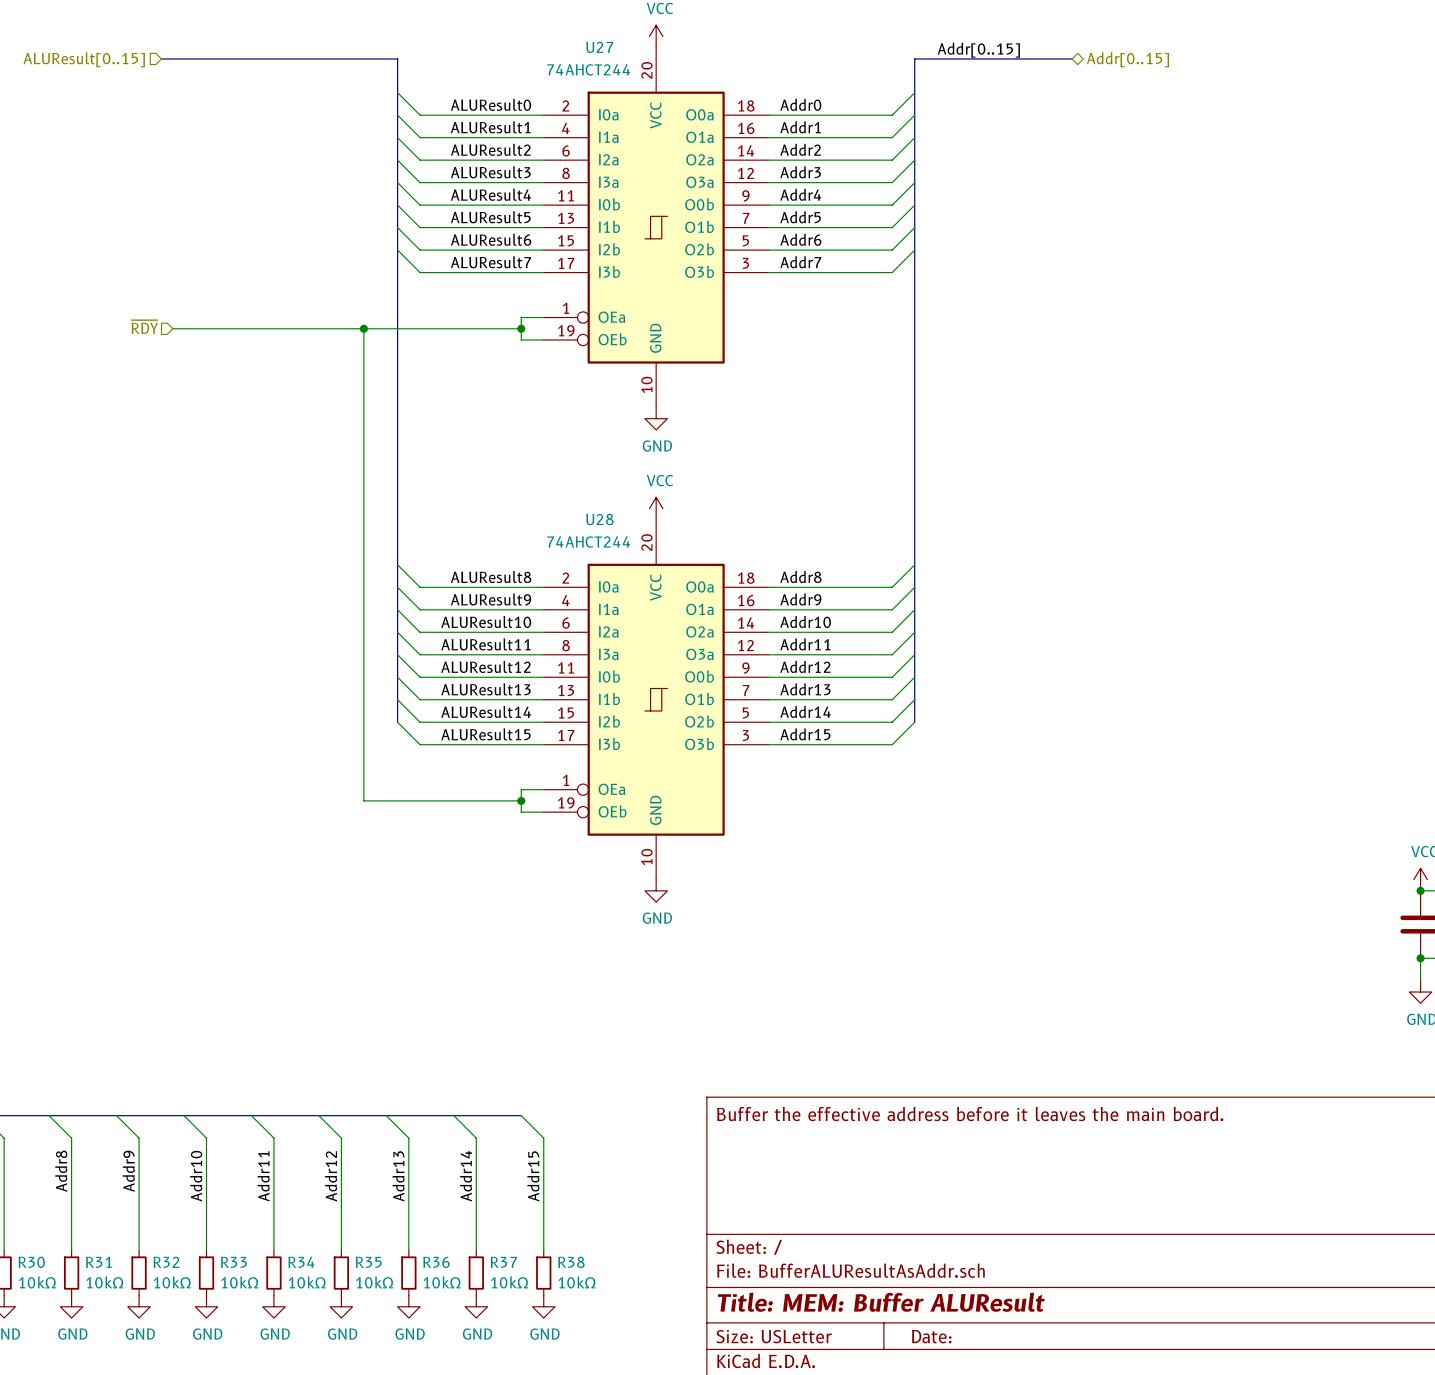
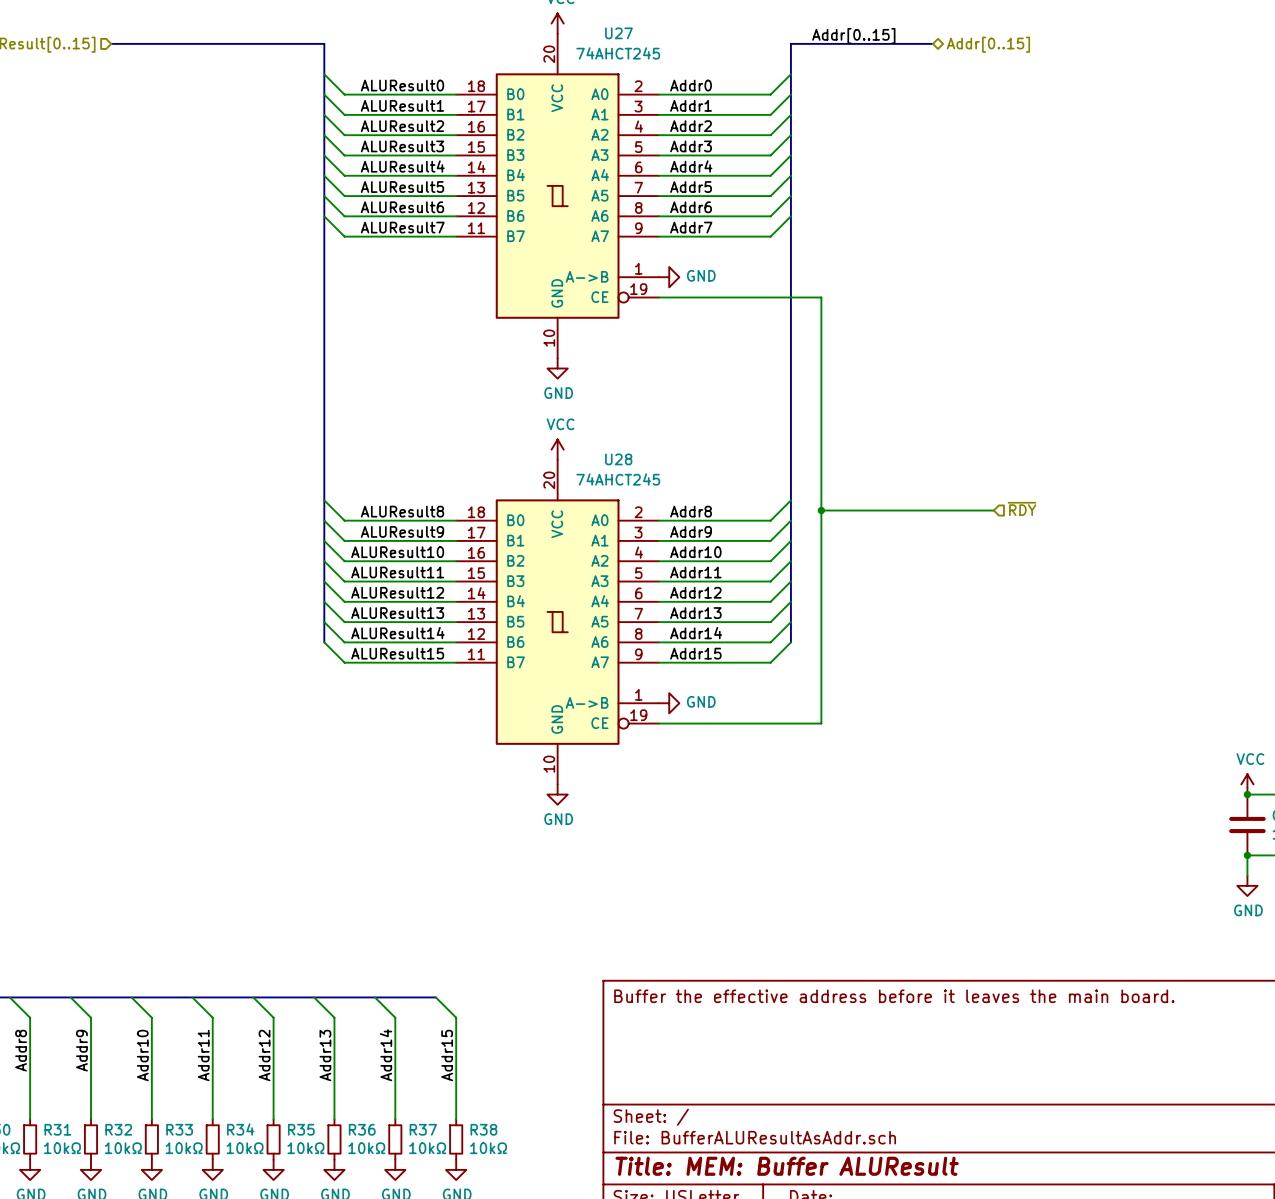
U27 symbol: [543, 47, 769, 408] -> [456, 33, 660, 359]
U27 name position: U27 (599, 47) -> U27 (618, 33)
U27 value: 74AHCT244 (588, 69) -> 74AHCT245 (618, 53)
wire: (543, 317) (521, 317) (521, 340) (543, 340) -> none
power symbol: none -> GND (669, 277)
hierarchical label: ~{RDY} (144, 327) -> none
wire: (172, 328) (521, 328) -> none
wire: (363, 328) (363, 800) (521, 800) -> none
junction: (363, 328) -> none
junction: (521, 328) -> none
wire: none -> (659, 297) (821, 297) (821, 723) (659, 723)
U28 symbol: [543, 519, 769, 880] -> [456, 459, 660, 785]
U28 name position: U28 (599, 519) -> U28 (618, 459)
U28 value: 74AHCT244 (588, 542) -> 74AHCT245 (618, 479)
hierarchical label: none -> ~{RDY} (1022, 508)
wire: none -> (821, 510) (993, 510)
junction: none -> (821, 510)
wire: (543, 789) (521, 789) (521, 812) (543, 812) -> none
power symbol: none -> GND (669, 703)
junction: (521, 800) -> none

